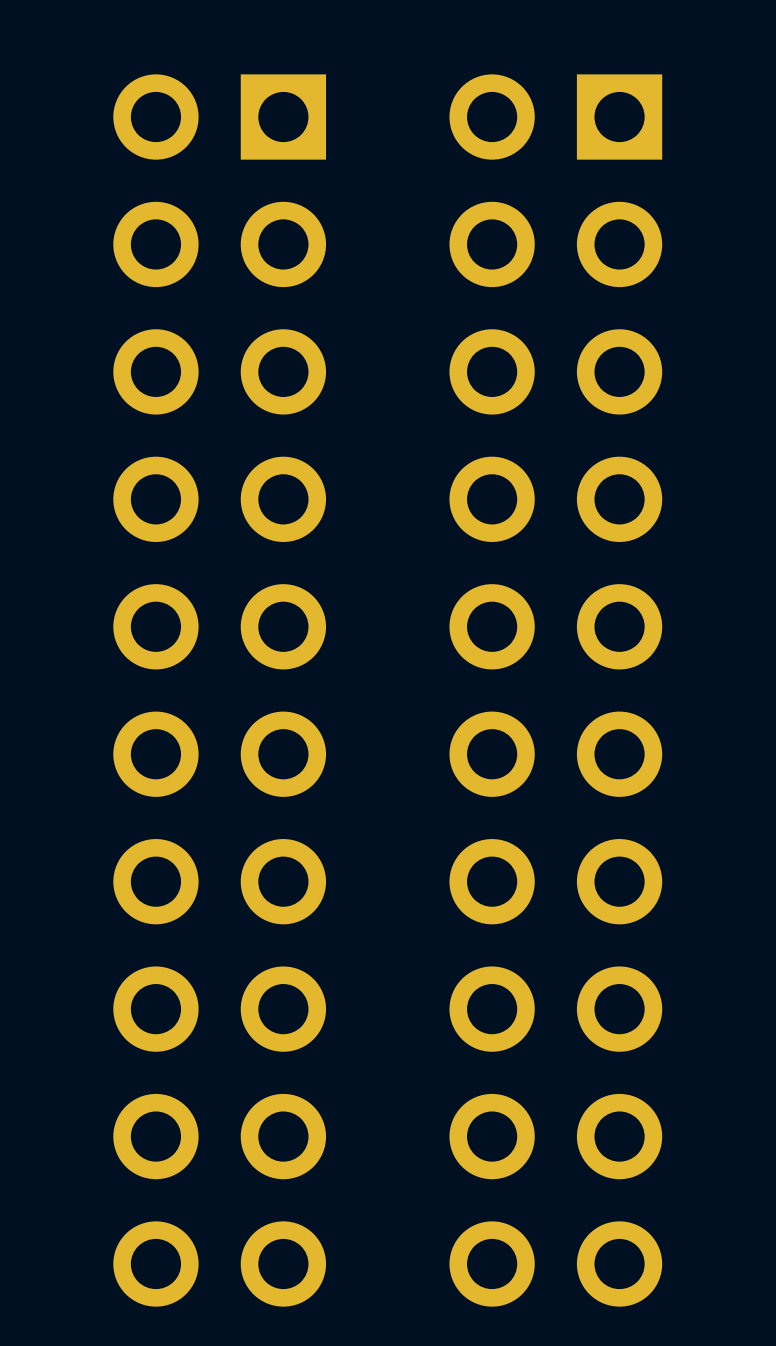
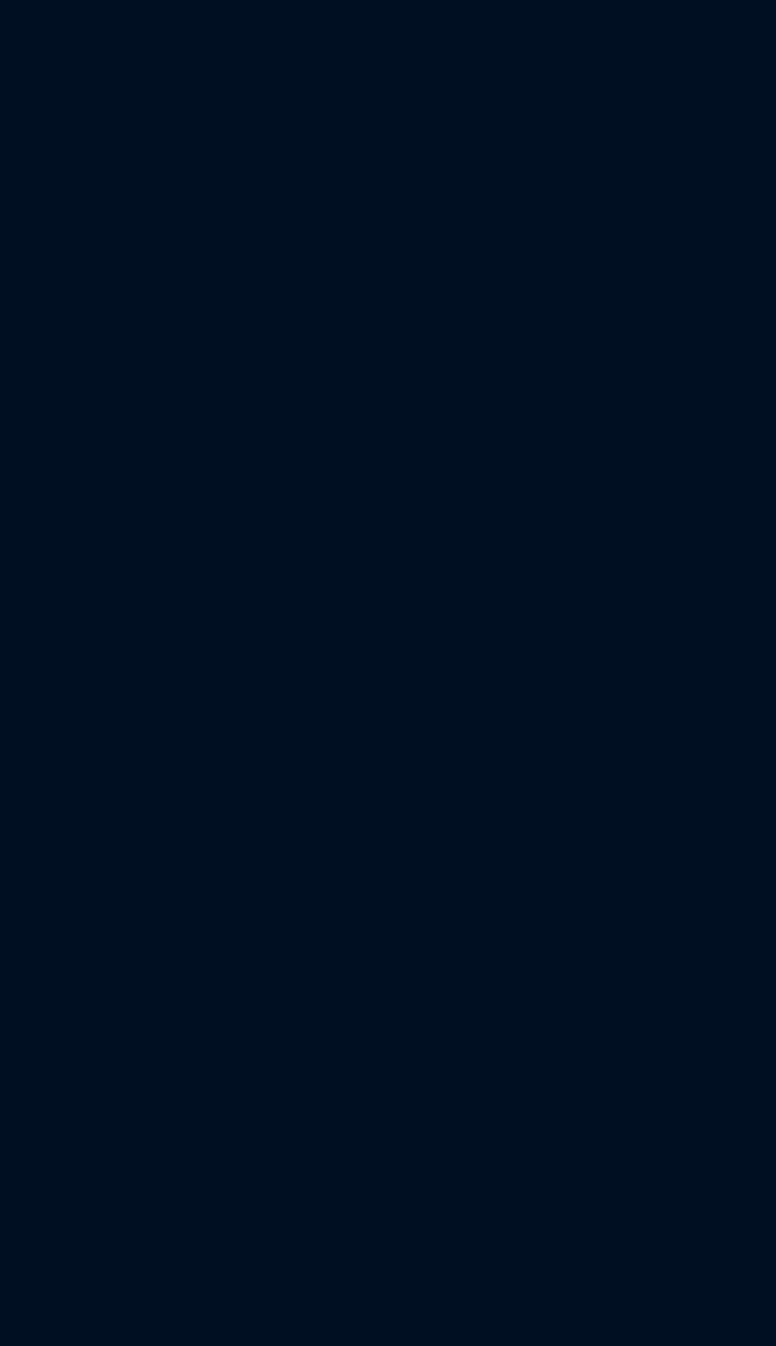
part: (219, 690) -> none
part: (555, 690) -> none

